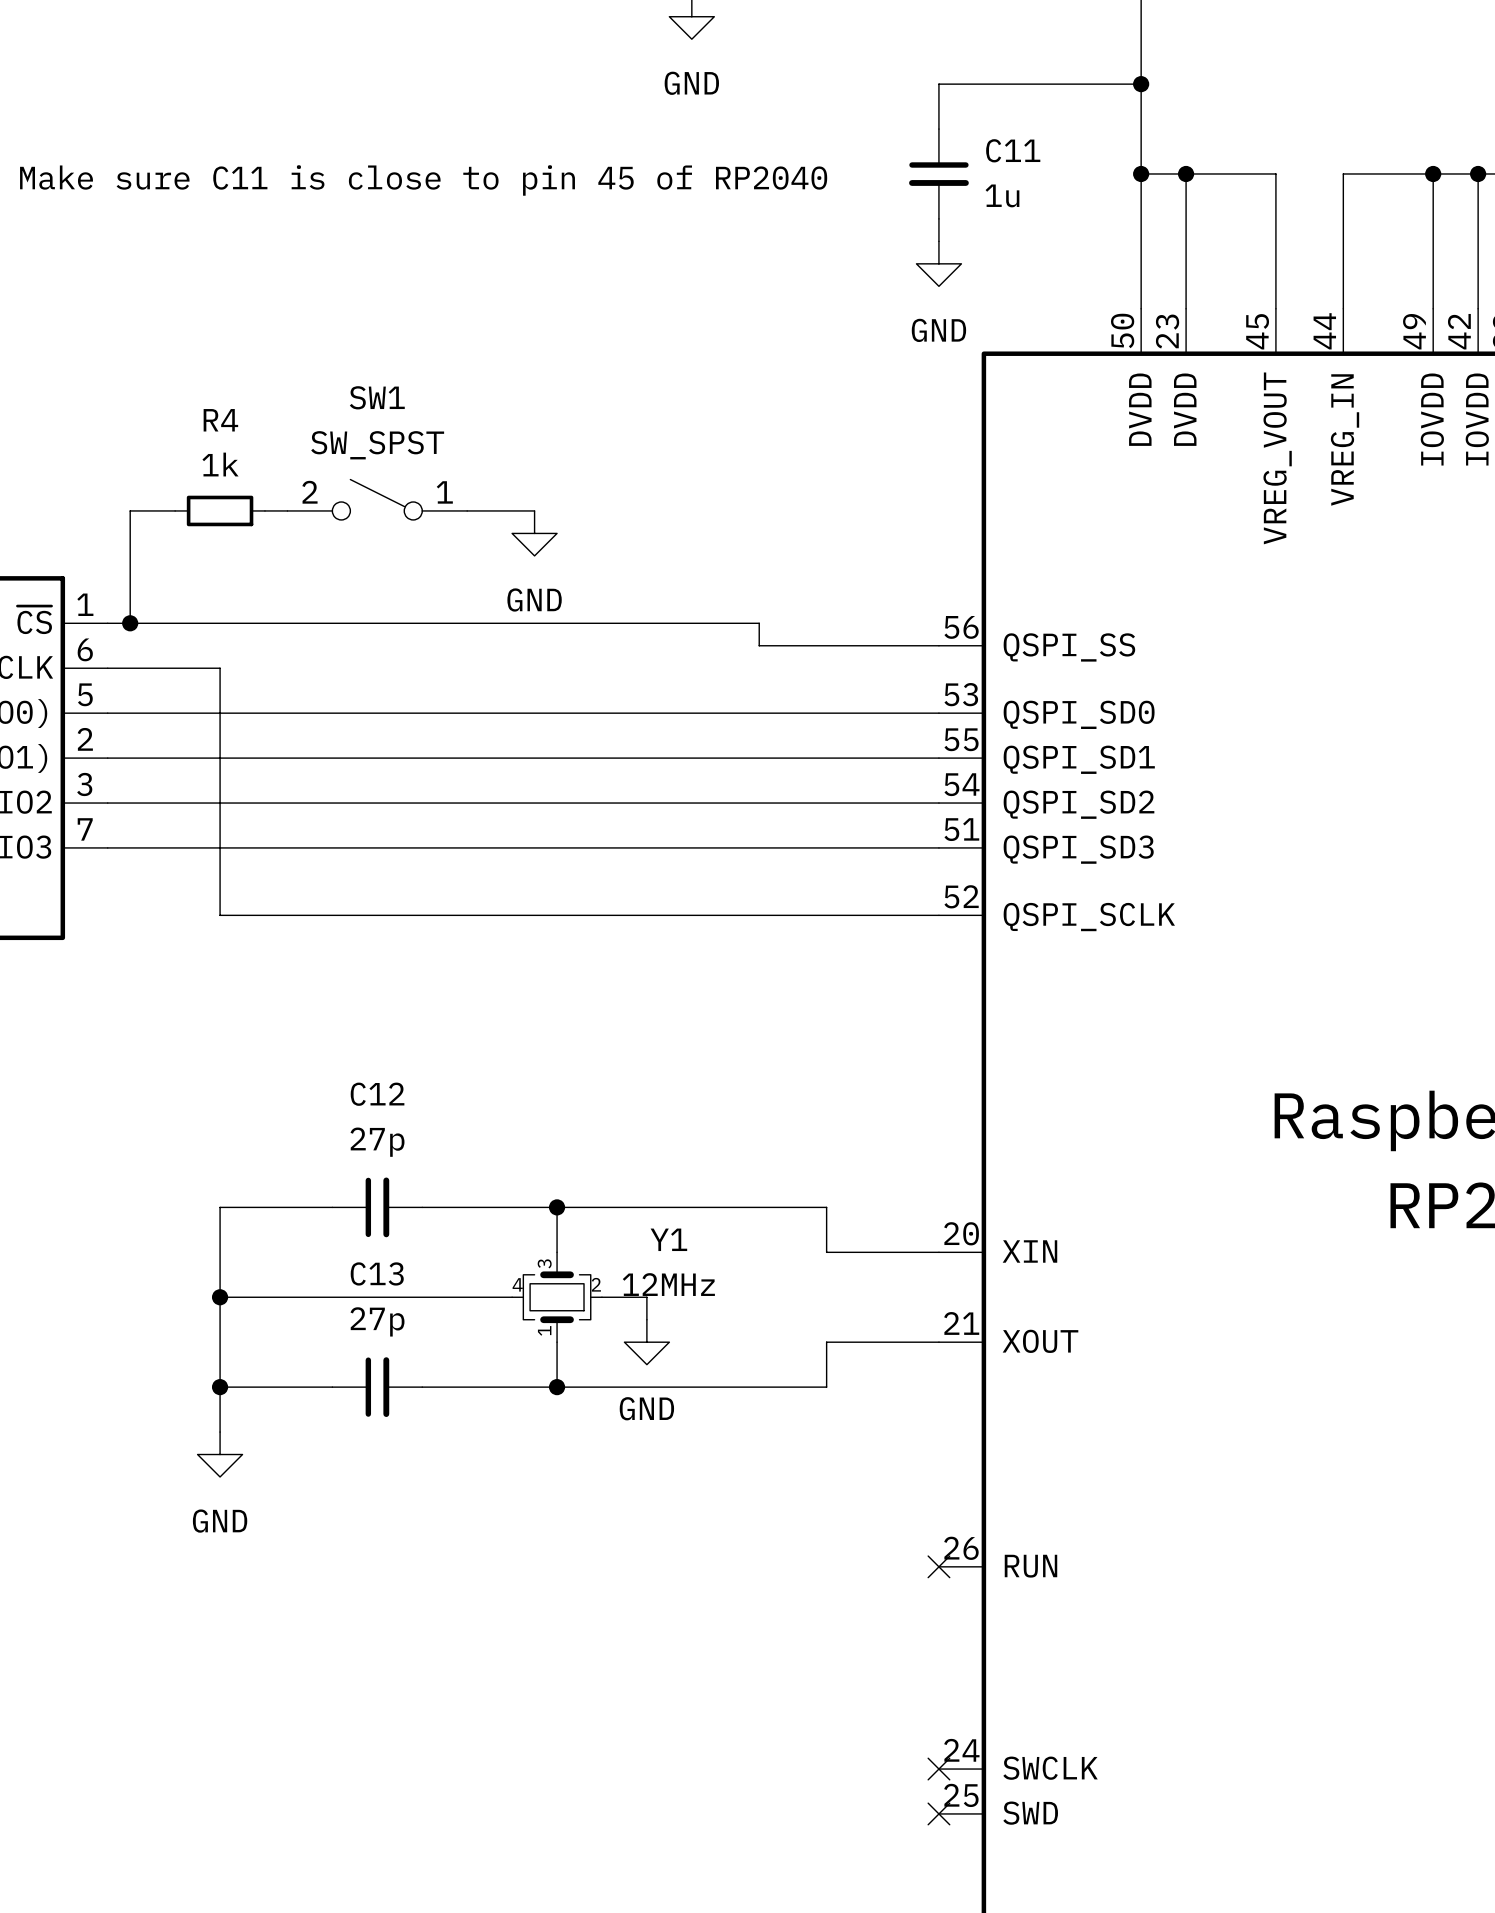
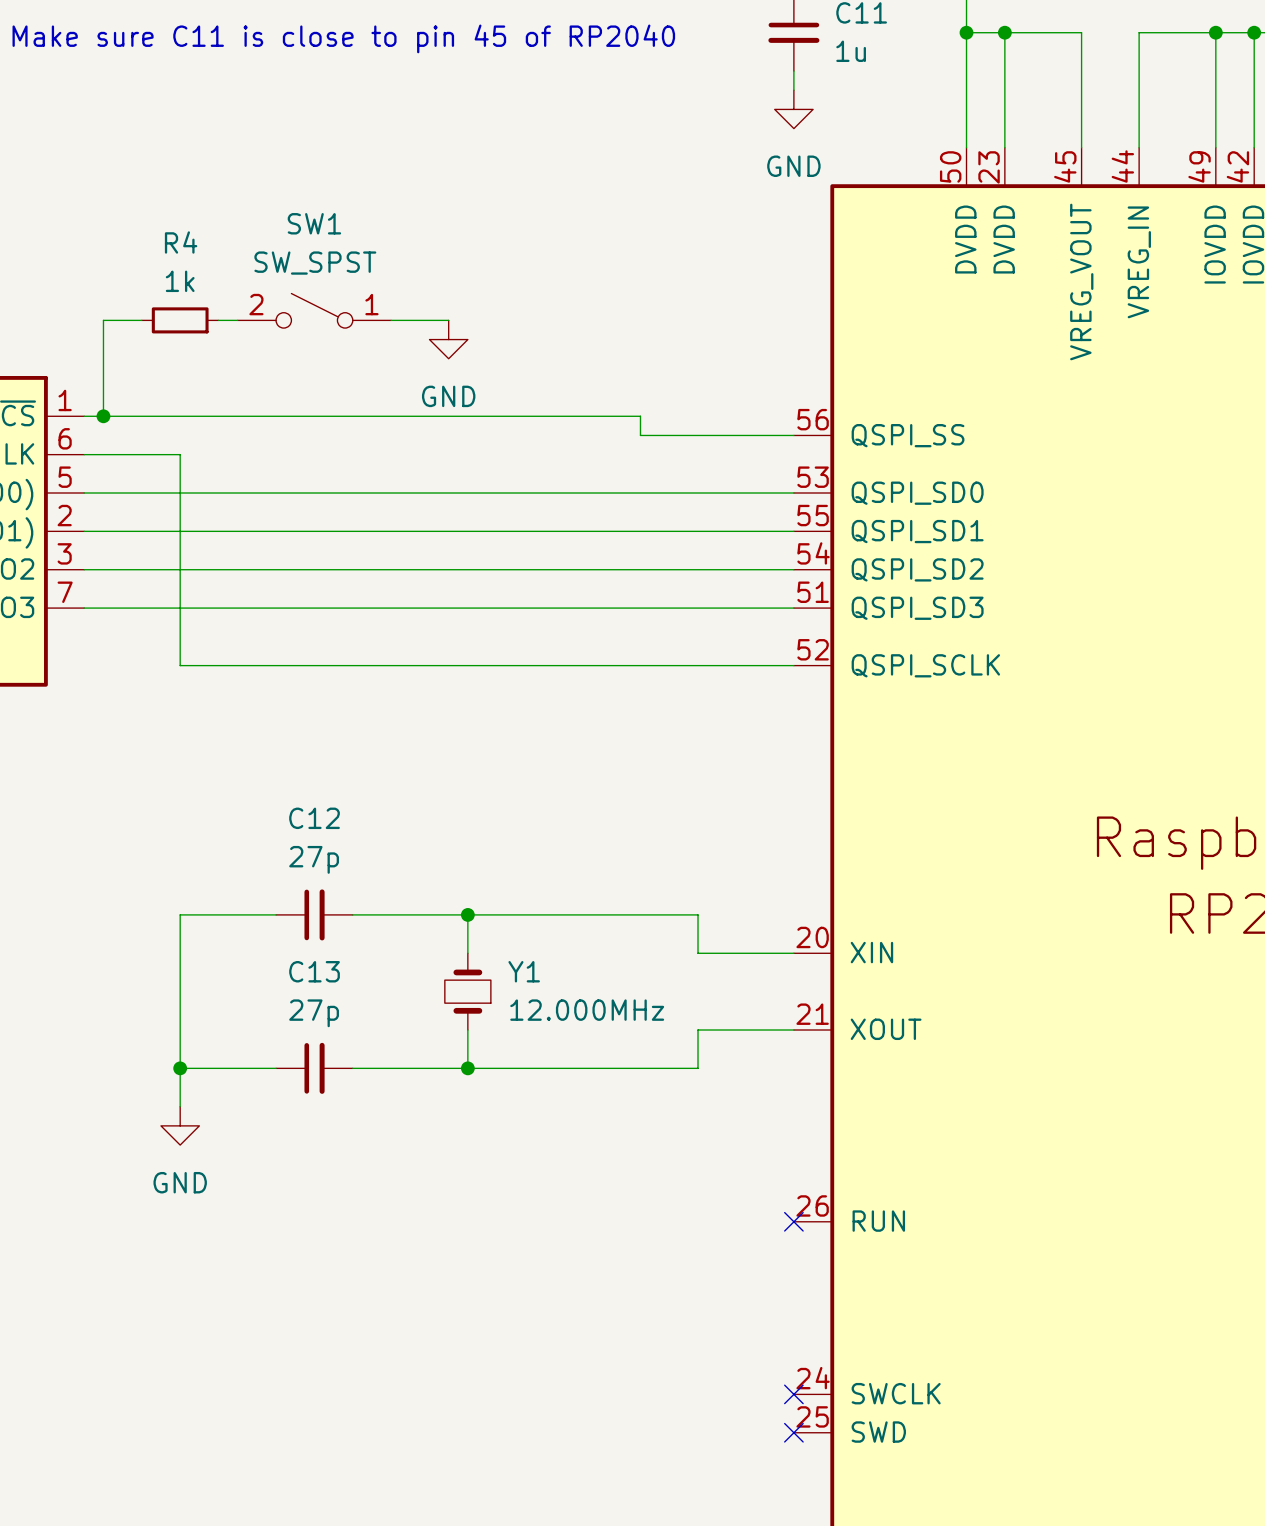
Y1 name position: Y1 (668, 1239) -> Y1 (524, 971)
Y1 symbol: [512, 1252, 602, 1343] -> [444, 953, 491, 1031]
Y1 value: 12MHz (668, 1284) -> 12.000MHz (587, 1010)
wire: (220, 1297) (512, 1297) -> none
junction: (220, 1297) -> none
wire: (601, 1297) (646, 1297) (646, 1319) -> none
power symbol: GND (646, 1342) -> none

